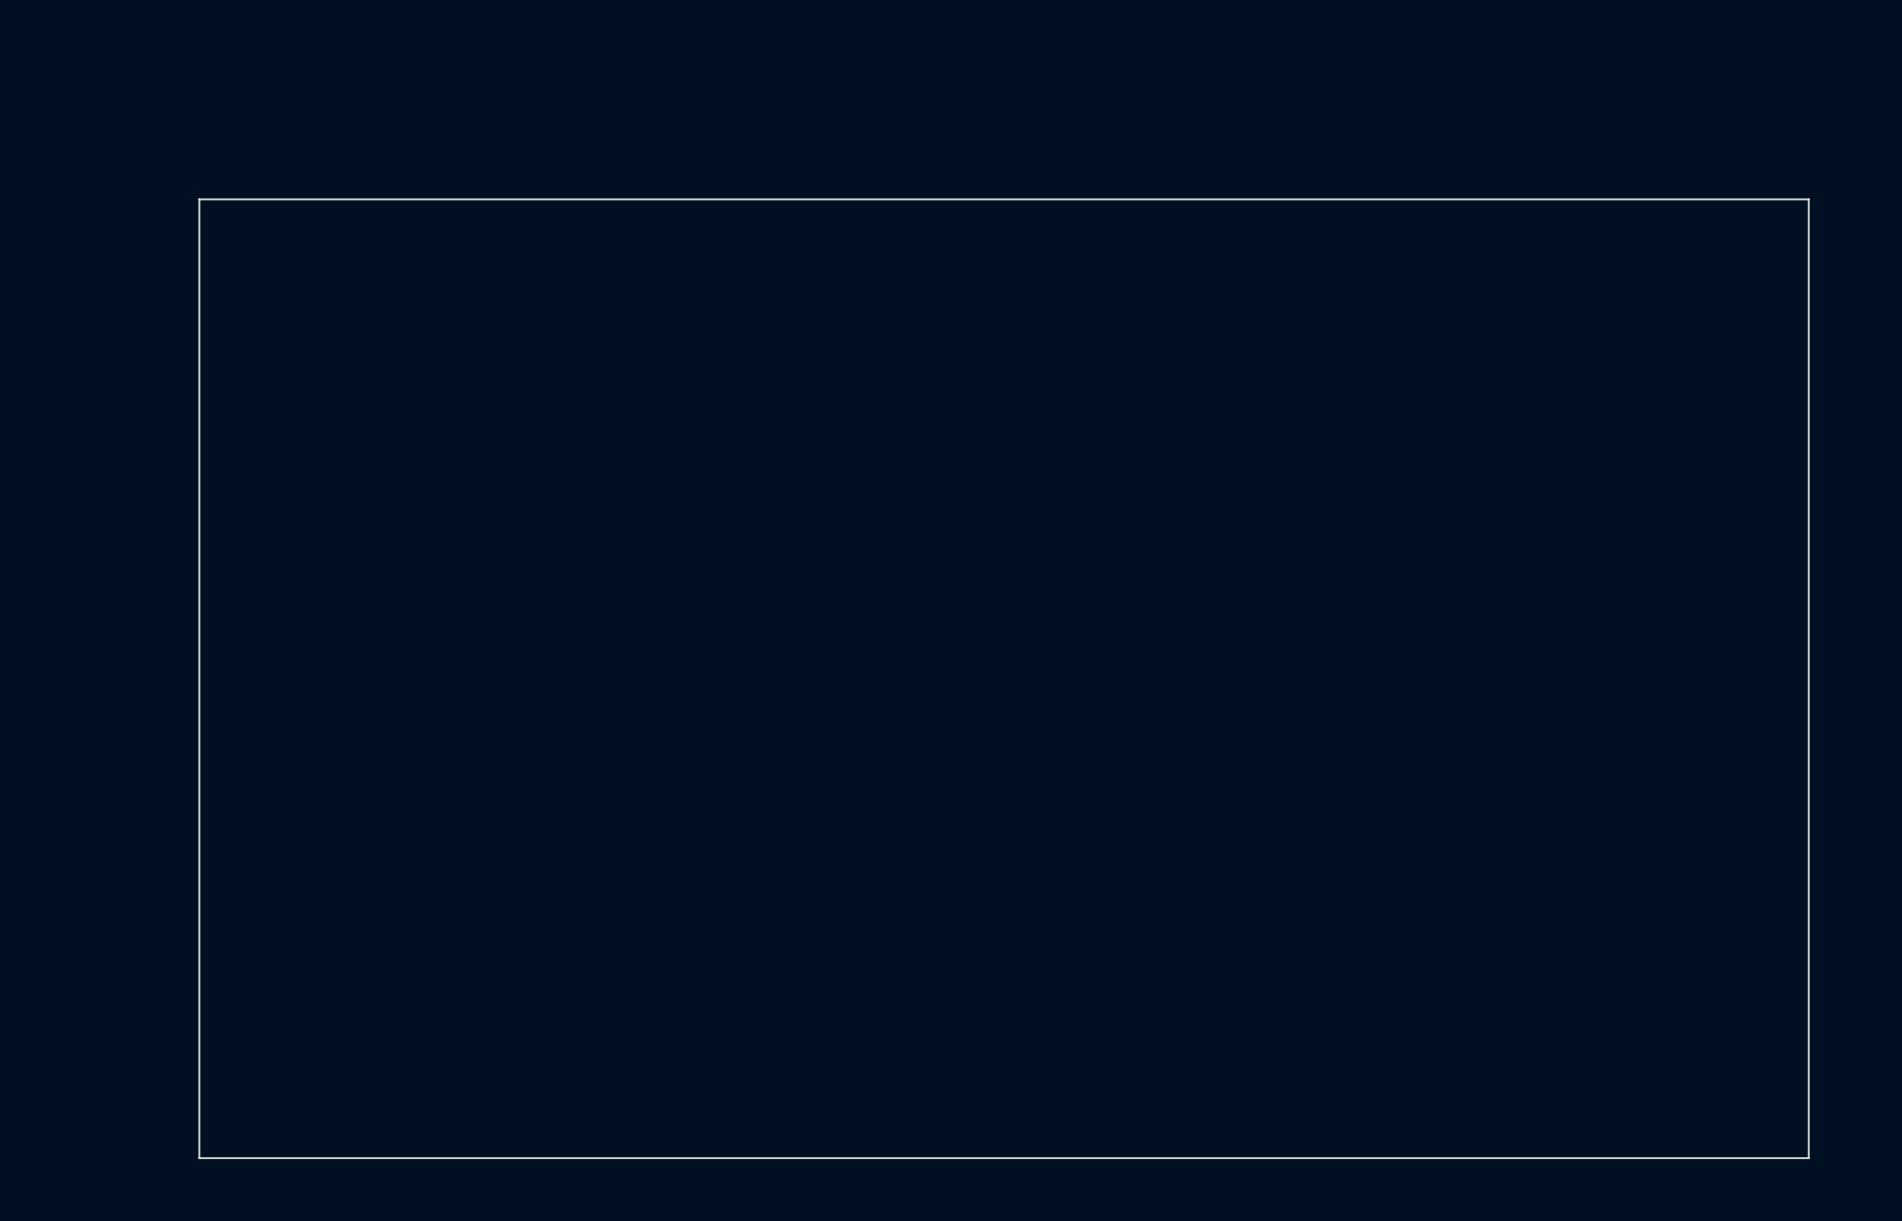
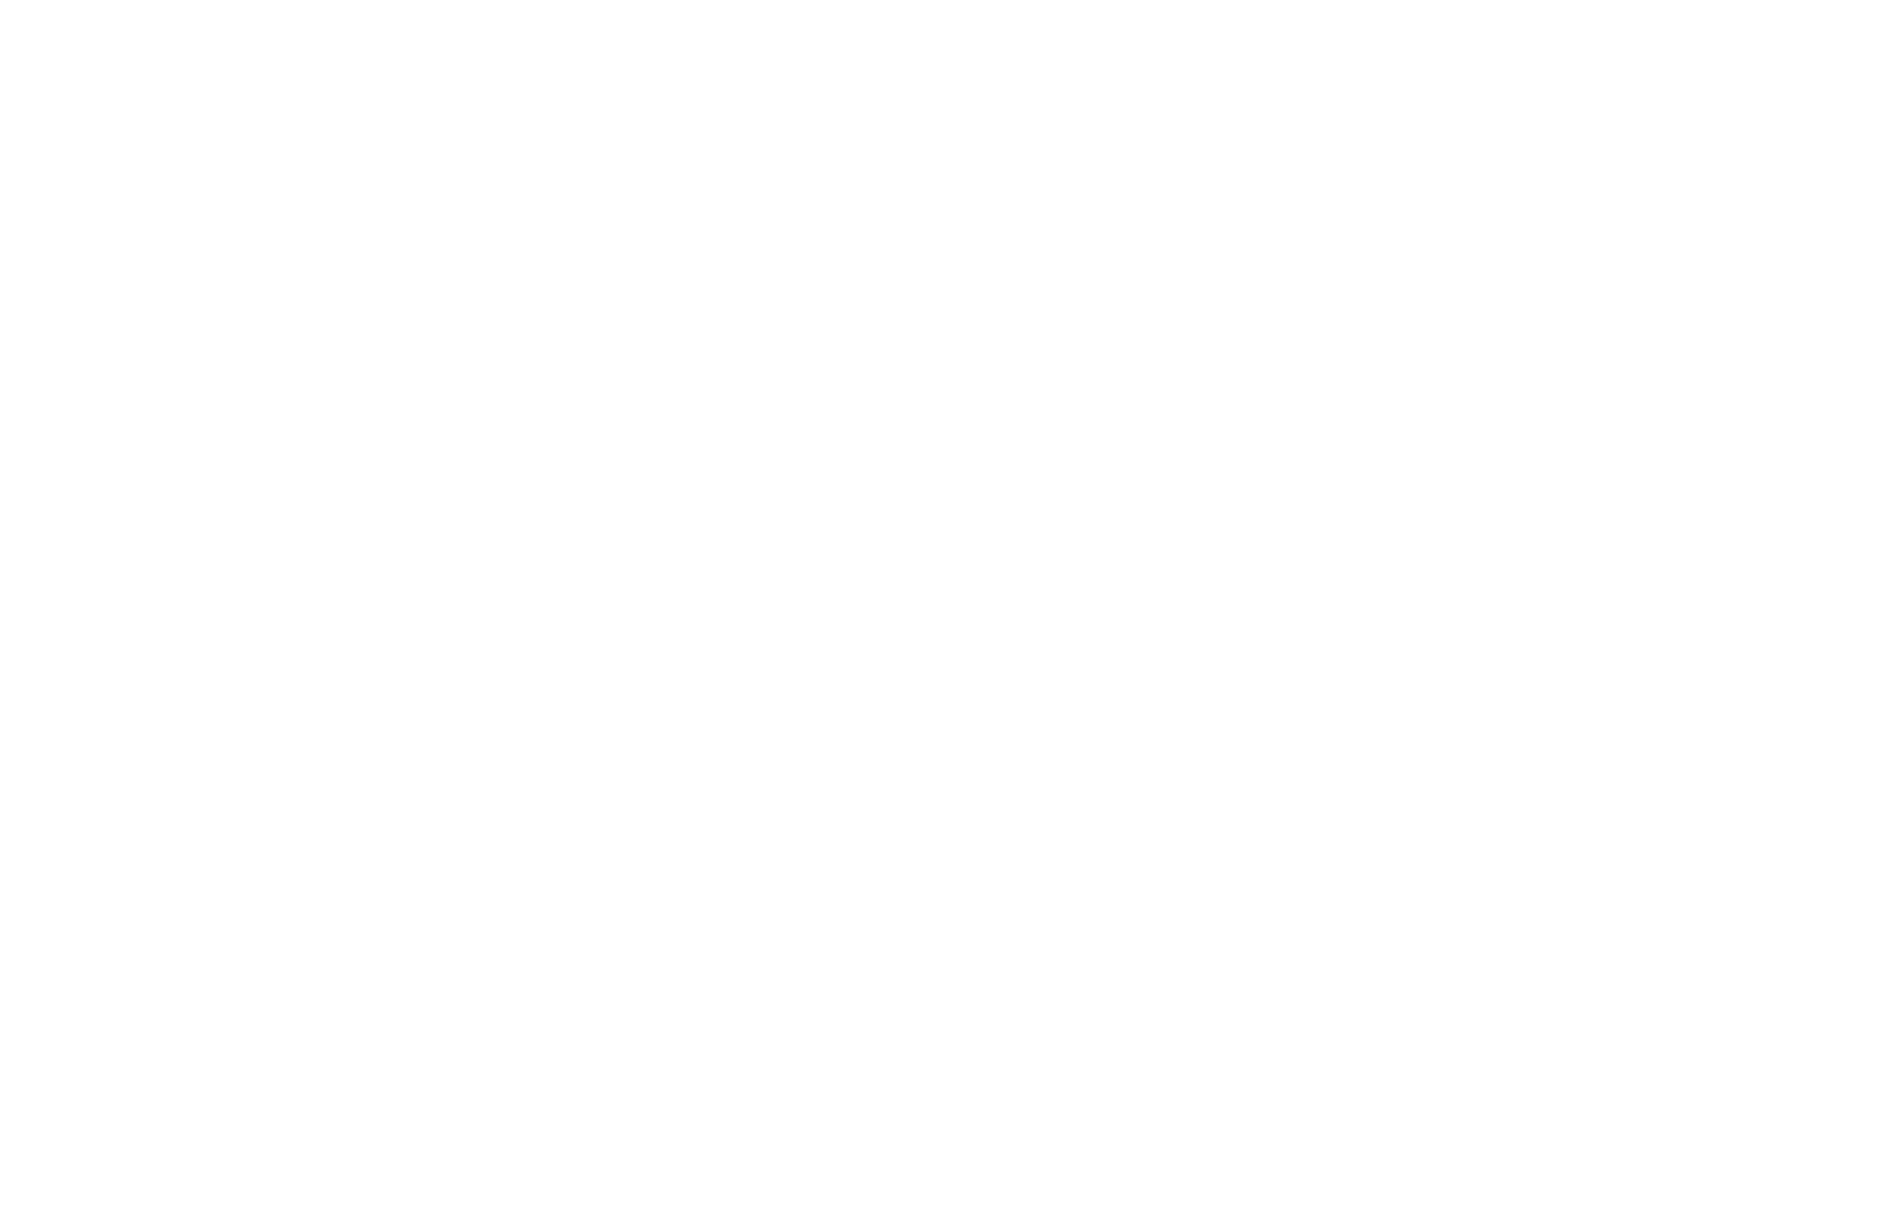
board edge: (199, 199) (1808, 199) (1808, 1158) (199, 1158) (199, 199) -> none

